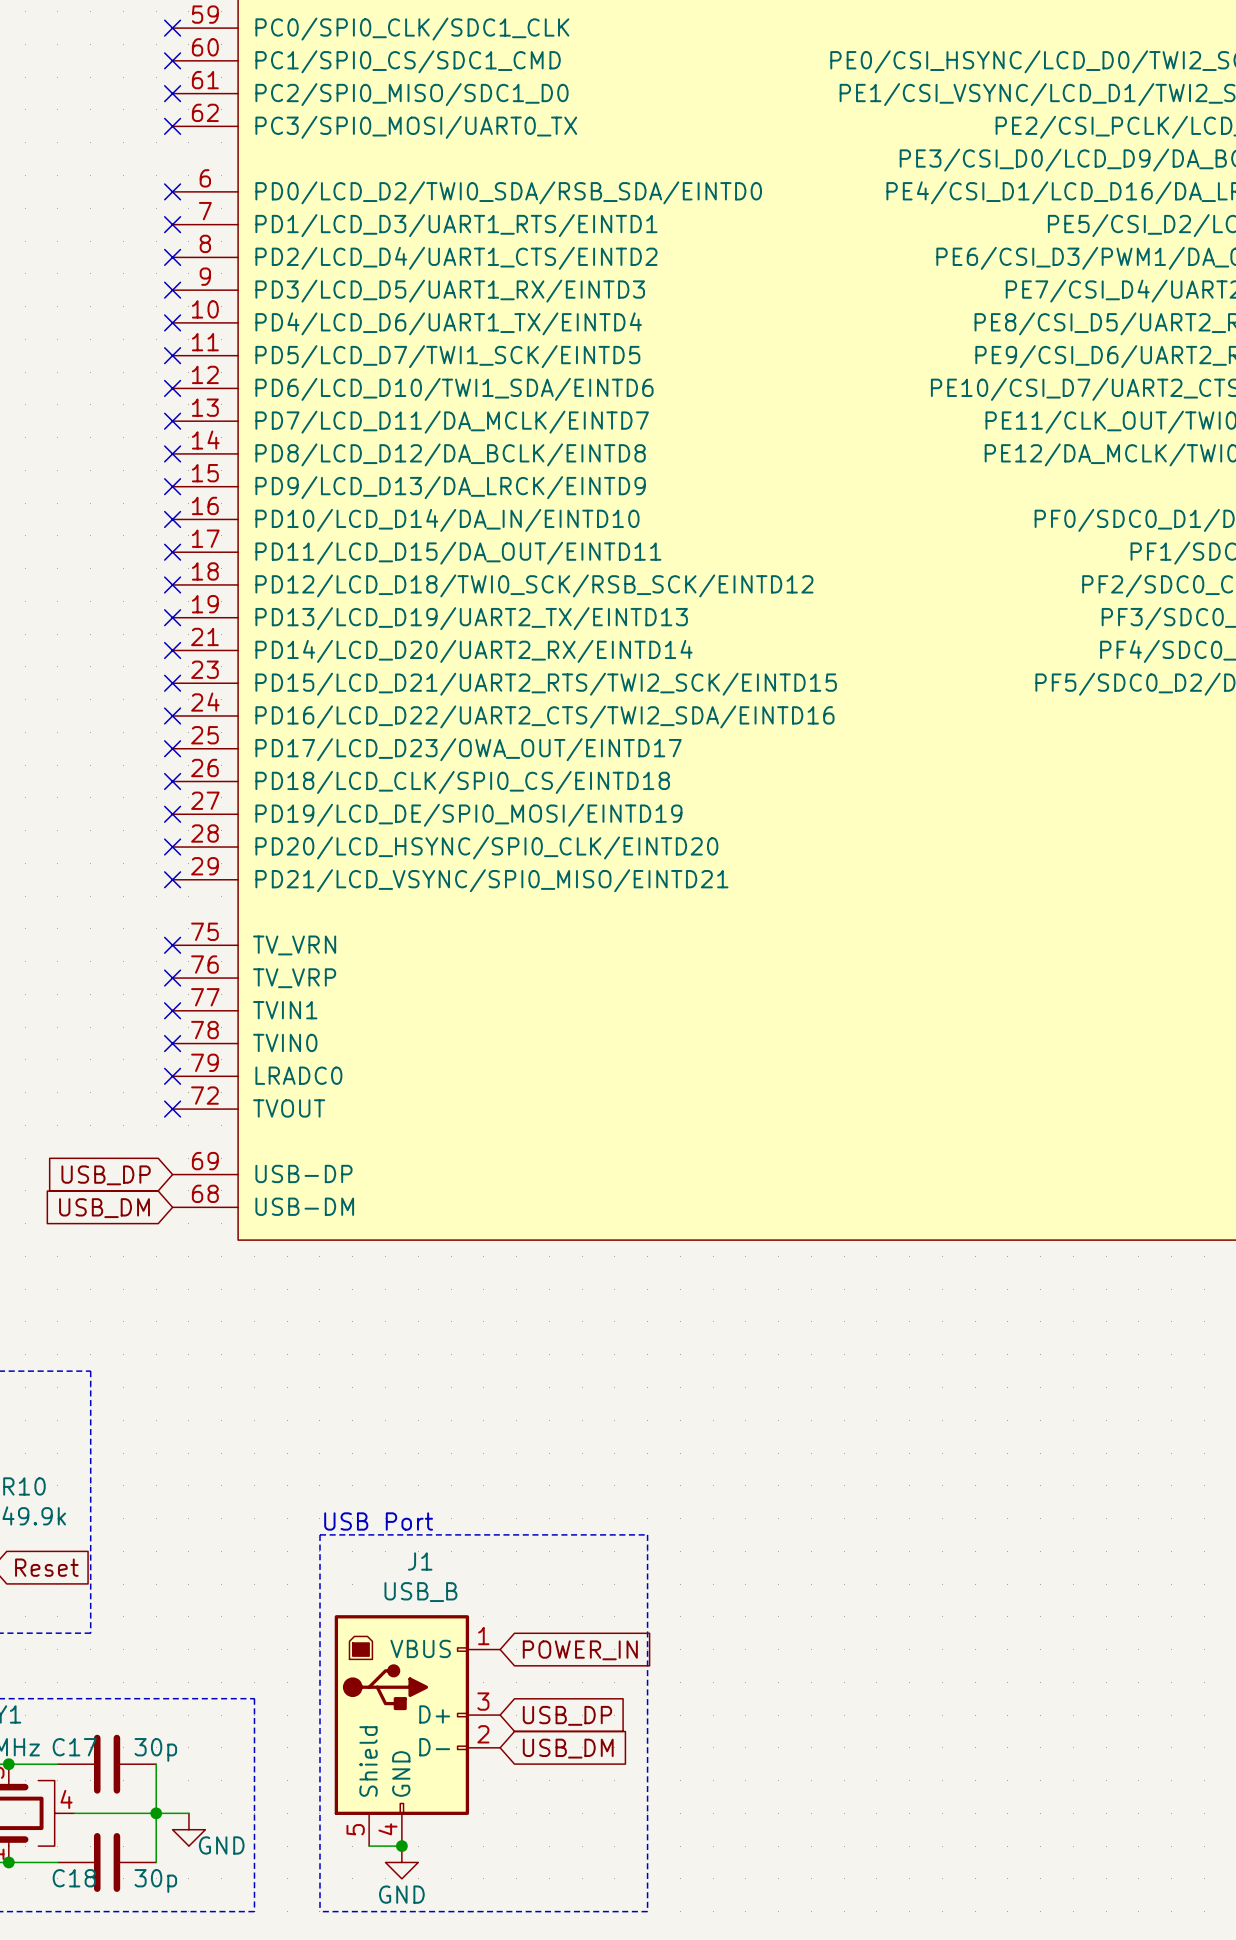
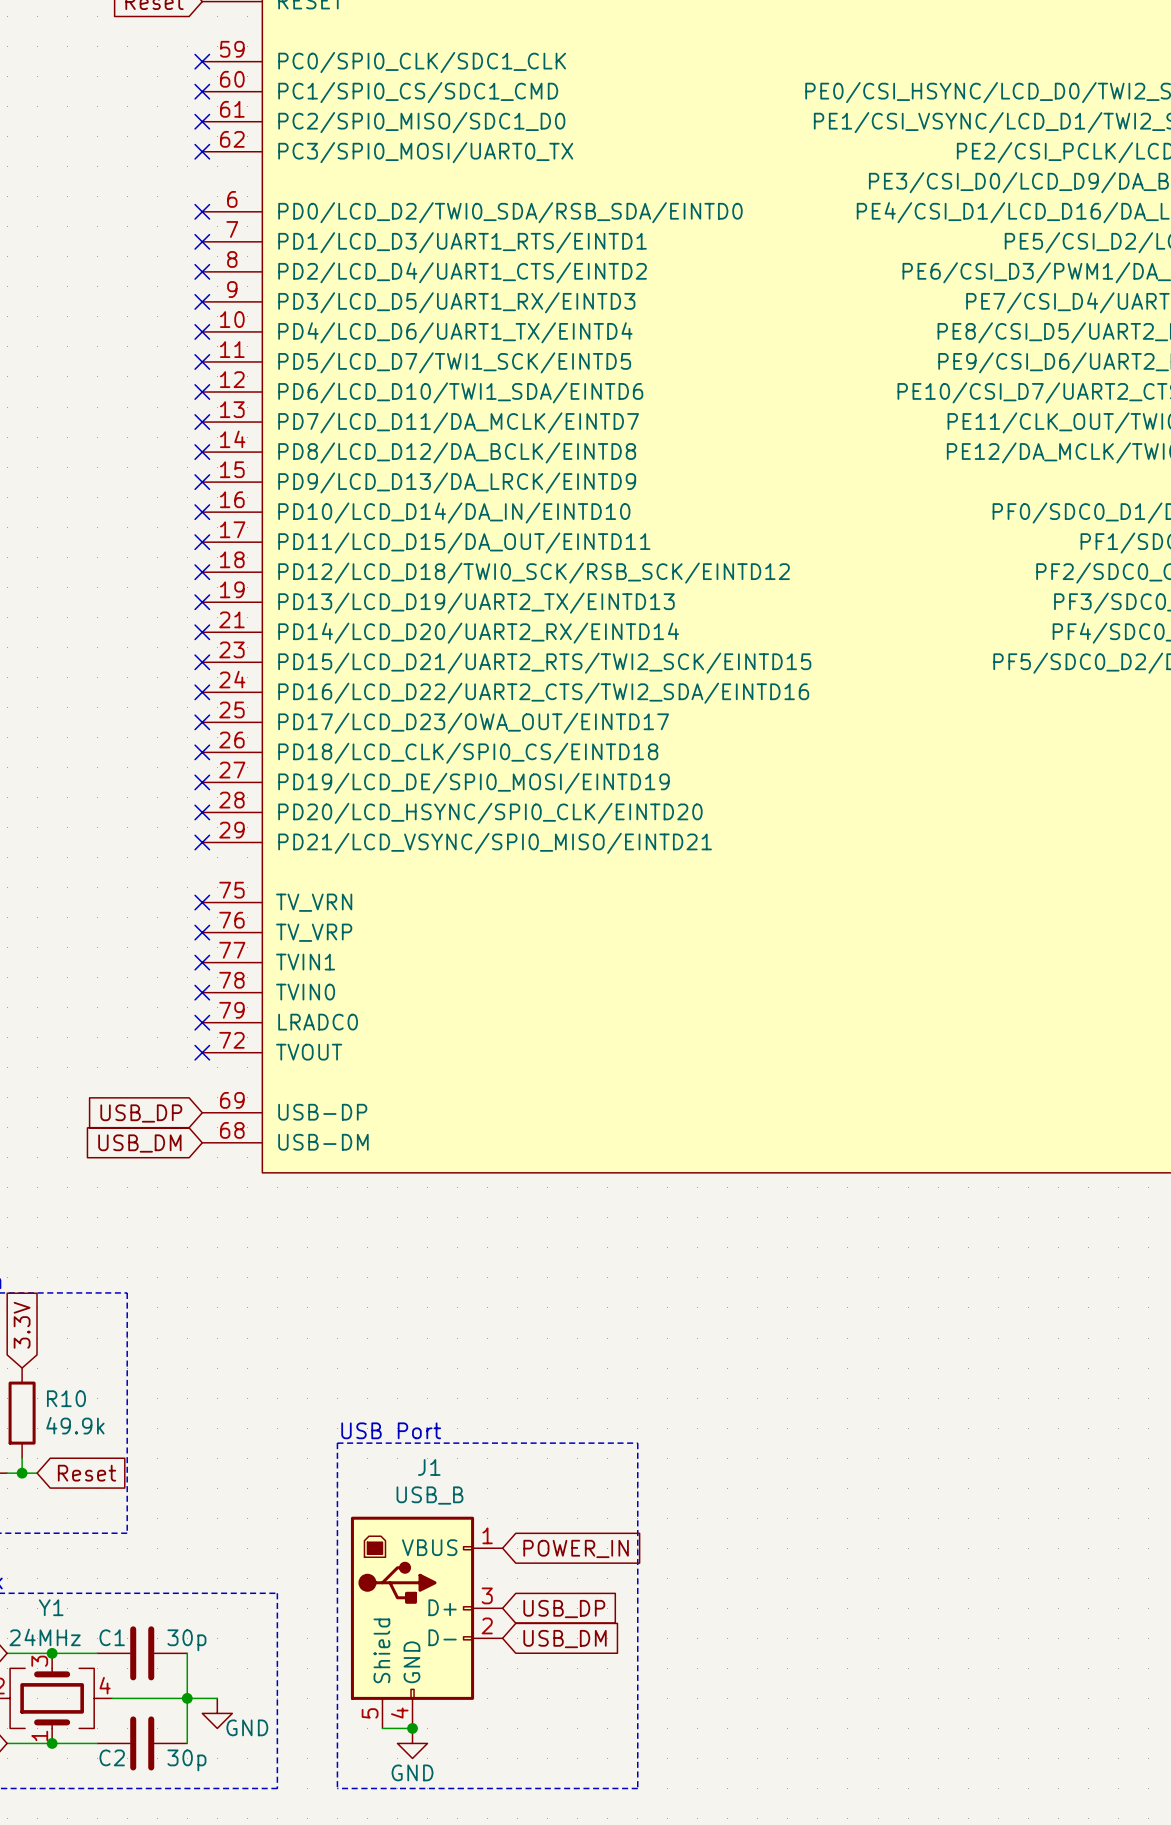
C17 name: C17 (74, 1747) -> C1 (112, 1637)
C18 name: C18 (74, 1878) -> C2 (112, 1757)

